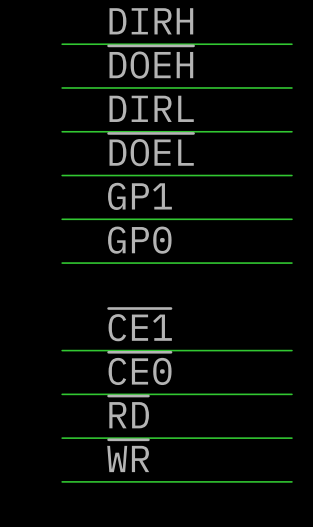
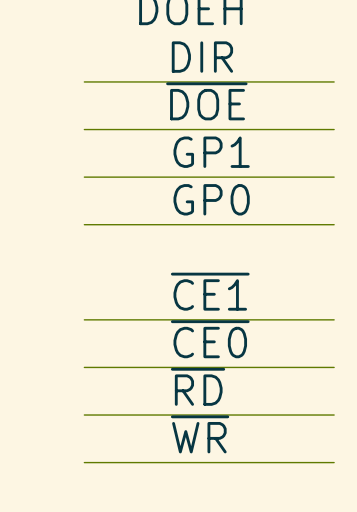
wire: (62, 87) (291, 87) -> none
label: DIRL (151, 108) -> DIR (202, 57)
label: ~{DOEL} (151, 149) -> ~{DOE} (206, 101)
label position: GP1 (139, 196) -> GP1 (211, 152)
label position: GP0 (139, 240) -> GP0 (211, 199)
label position: ~{CE1} (140, 324) -> ~{CE1} (210, 291)
label position: ~{CE0} (140, 368) -> ~{CE0} (210, 339)
label position: ~{RD} (128, 412) -> ~{RD} (198, 386)
label position: ~{WR} (128, 455) -> ~{WR} (200, 434)

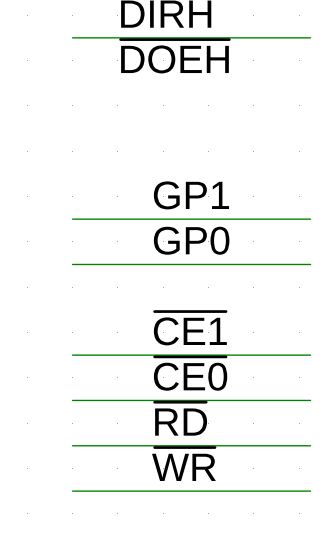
label: DIR (202, 57) -> none
wire: (84, 81) (334, 81) -> none
label: ~{DOE} (206, 101) -> none
wire: (84, 129) (334, 129) -> none

